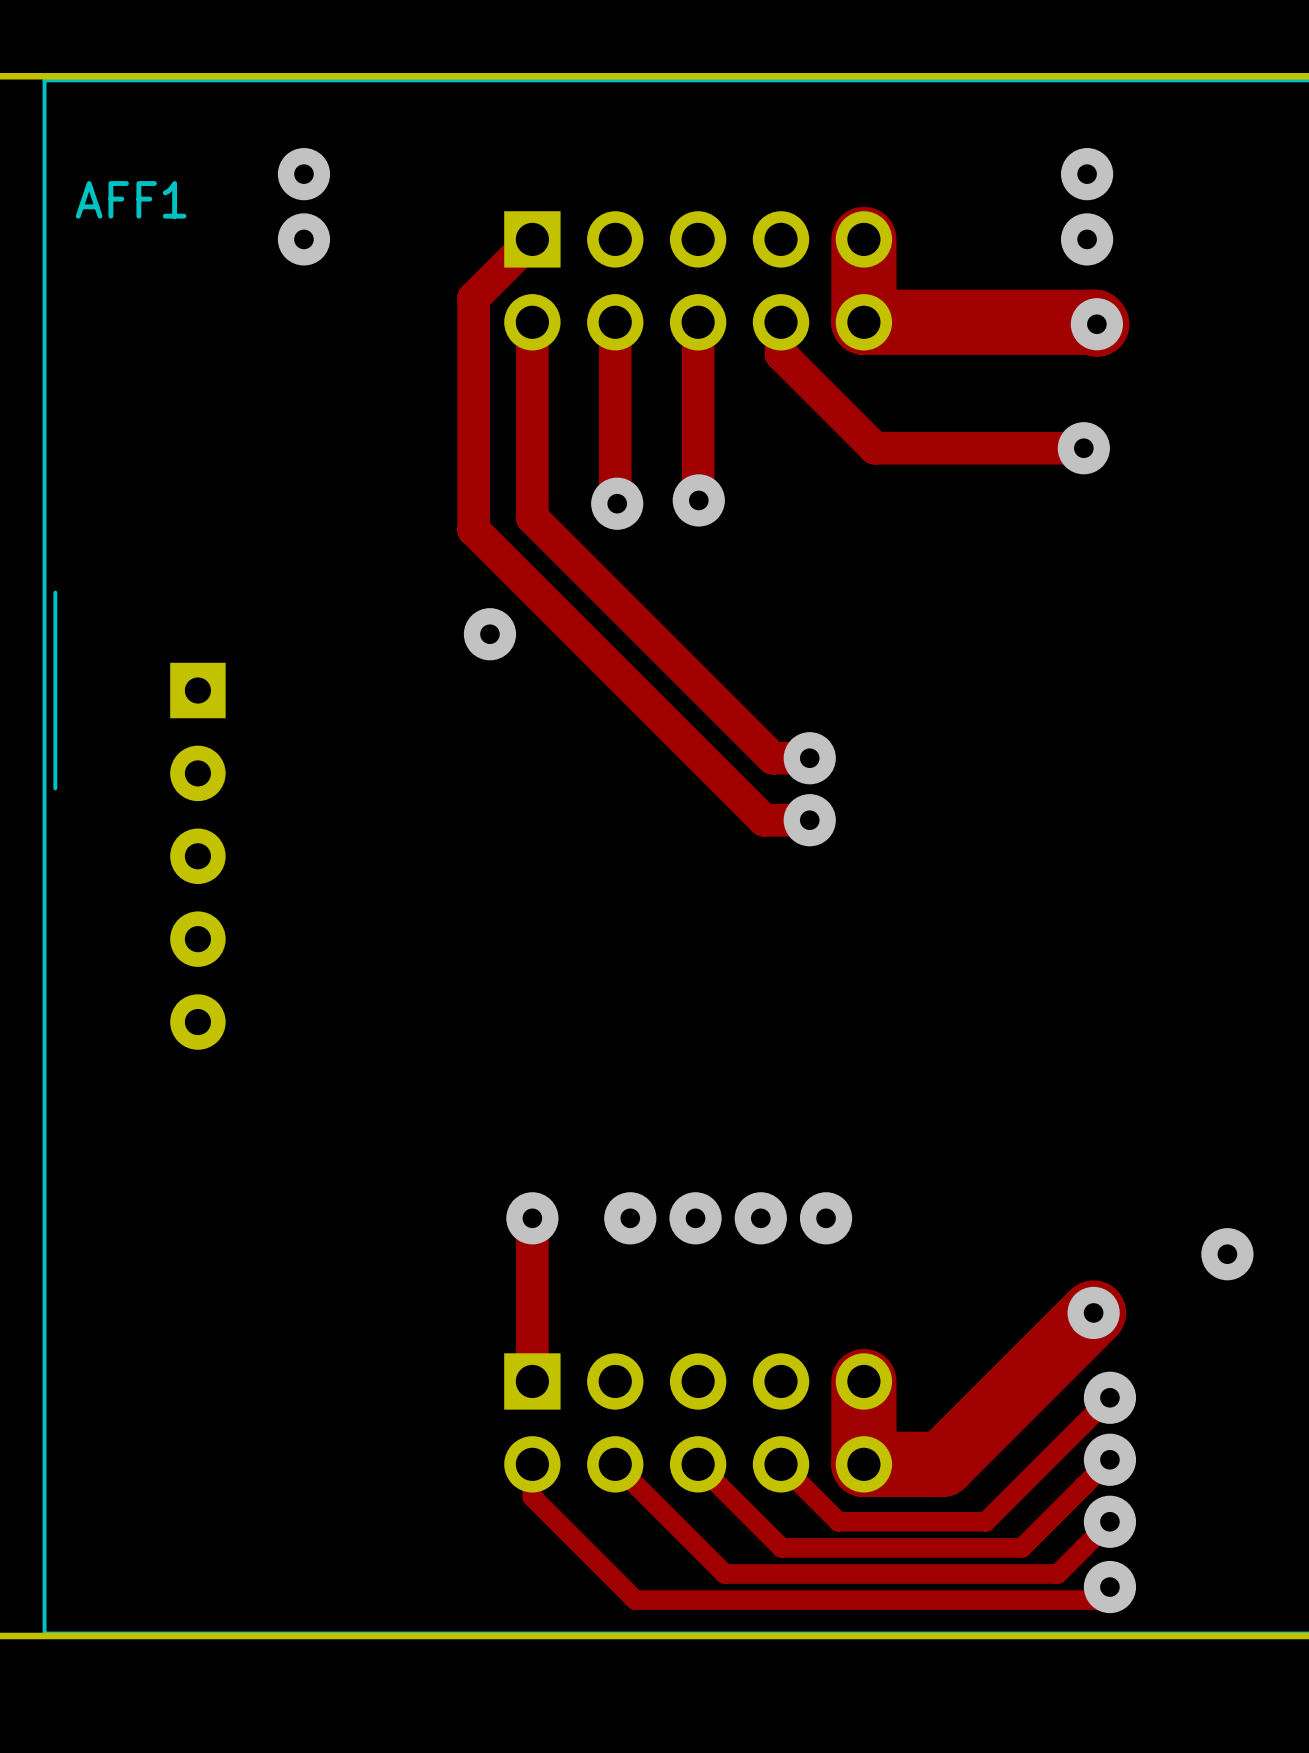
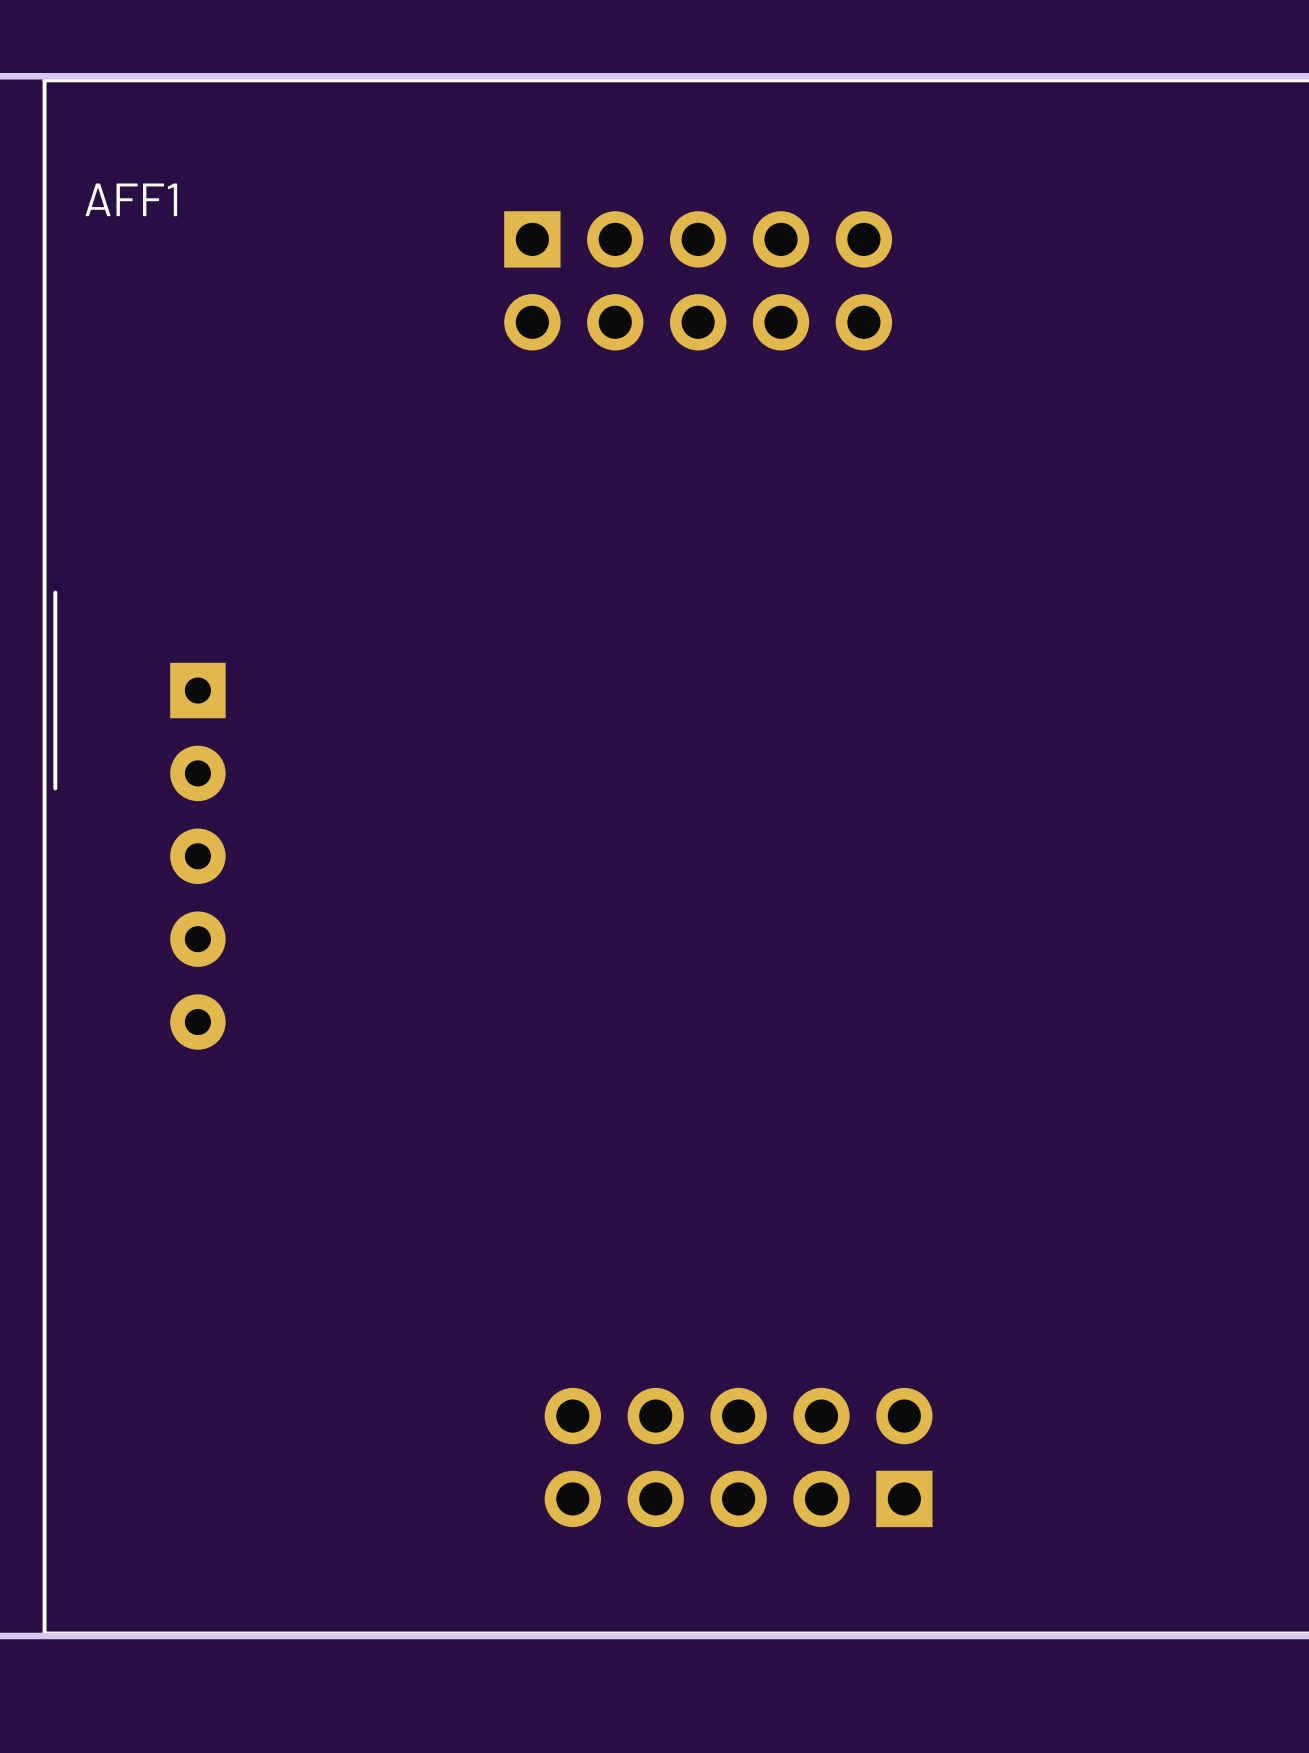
via: (303, 174) -> none
via: (1087, 174) -> none
via: (303, 239) -> none
track: (532, 239) (473, 298) (473, 529) (764, 820) (809, 820) -> none
track: (863, 239) (863, 322) (1094, 322) (1096, 324) -> none
via: (1087, 239) -> none
track: (532, 322) (532, 517) (772, 758) (809, 758) -> none
track: (615, 322) (615, 501) (617, 503) -> none
track: (698, 322) (698, 500) -> none
track: (781, 322) (781, 354) (875, 448) (1083, 448) -> none
via: (1096, 324) -> none
via: (1083, 448) -> none
via: (698, 500) -> none
via: (617, 503) -> none
via: (489, 634) -> none
via: (809, 758) -> none
via: (809, 820) -> none
track: (532, 1218) (532, 1381) -> none
via: (532, 1218) -> none
via: (630, 1218) -> none
via: (695, 1218) -> none
via: (760, 1218) -> none
via: (826, 1218) -> none
via: (1227, 1254) -> none
track: (1093, 1312) (942, 1464) (863, 1464) (863, 1381) -> none
via: (1093, 1312) -> none
track: (1109, 1397) (985, 1521) (838, 1521) (781, 1464) -> none
via: (1109, 1397) -> none
part rotation: 0° (698, 1422) -> 180° (738, 1457)
track: (1109, 1459) (1021, 1547) (781, 1547) (698, 1464) -> none
via: (1109, 1459) -> none
track: (532, 1464) (532, 1496) (635, 1600) (1096, 1600) (1109, 1587) -> none
track: (615, 1464) (724, 1573) (1057, 1573) (1109, 1521) -> none
via: (1109, 1521) -> none
via: (1109, 1587) -> none

